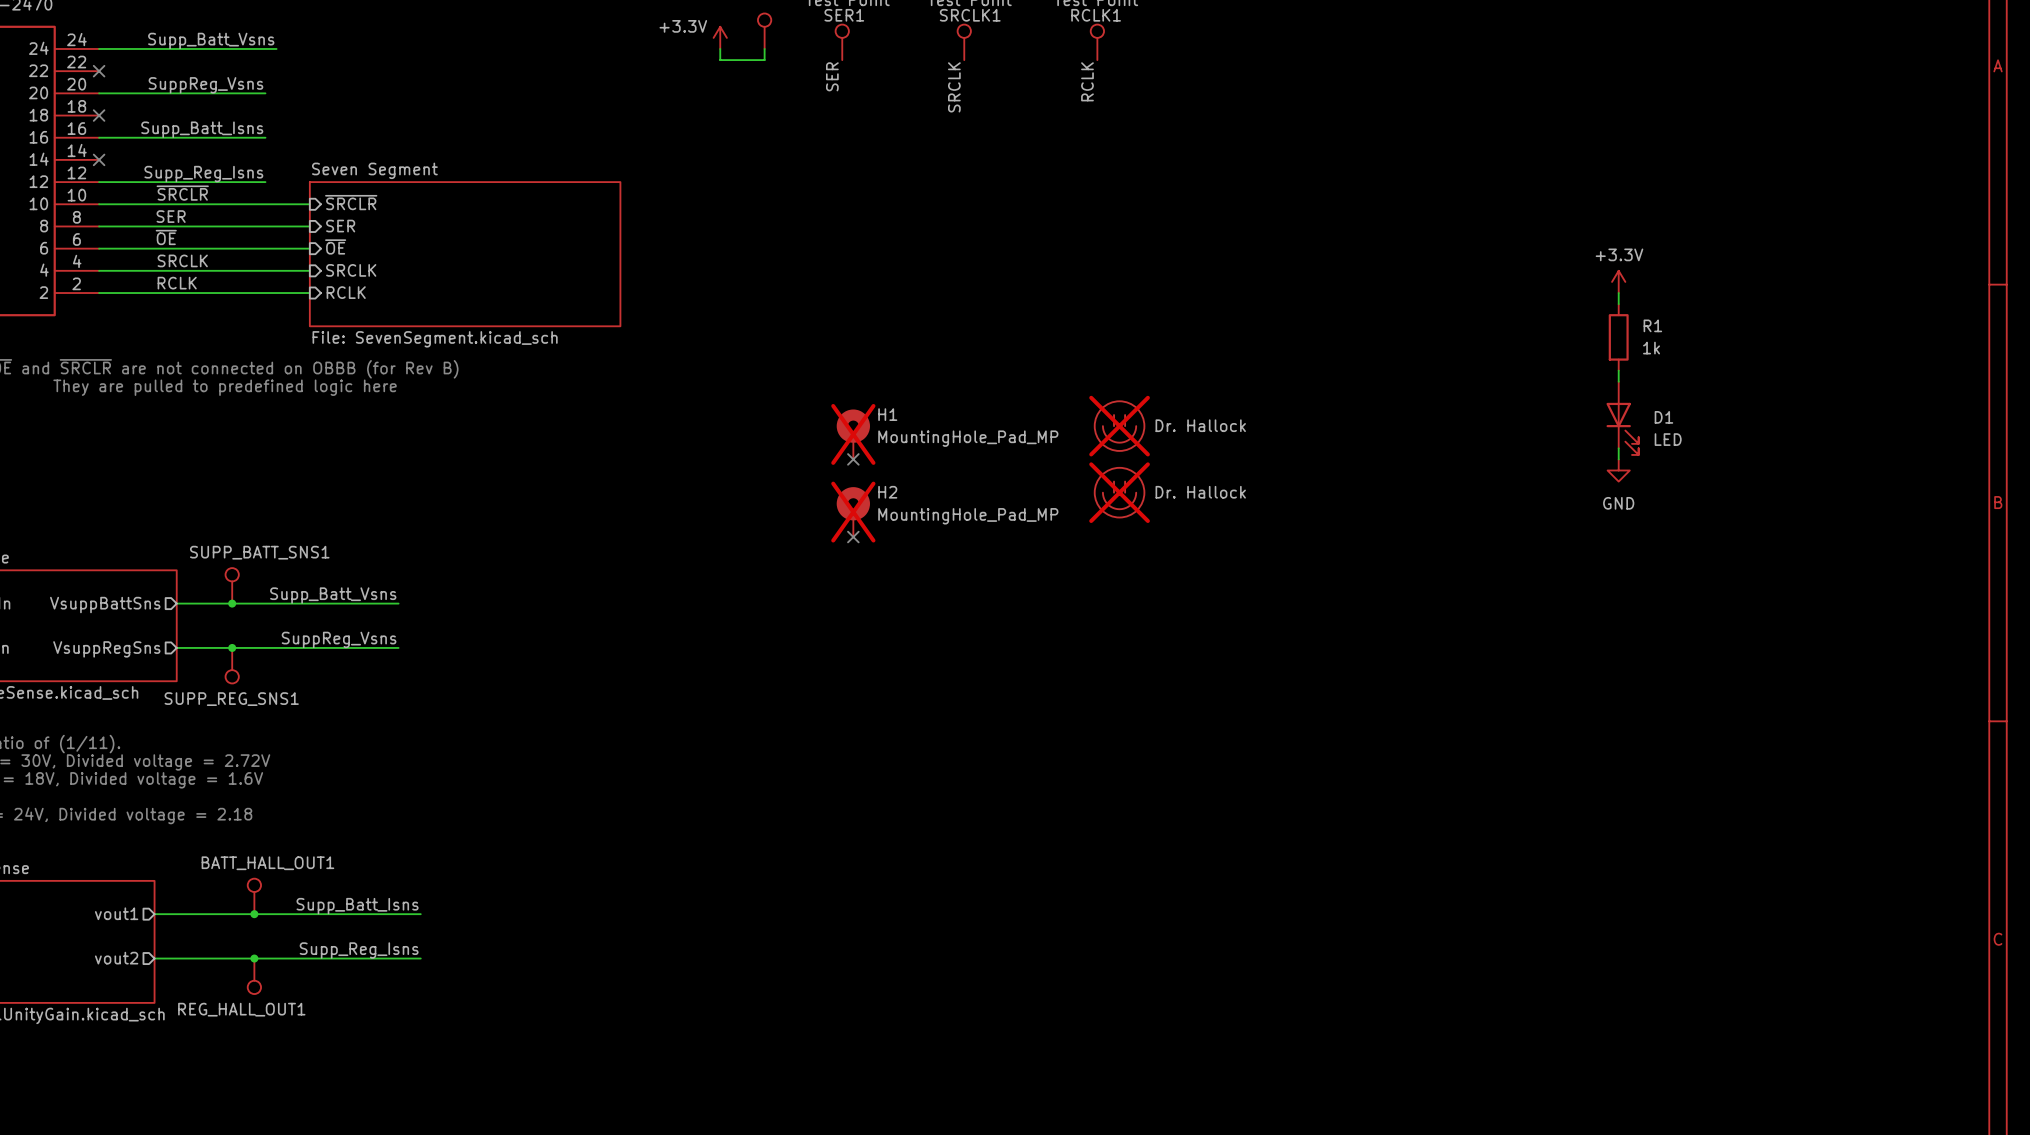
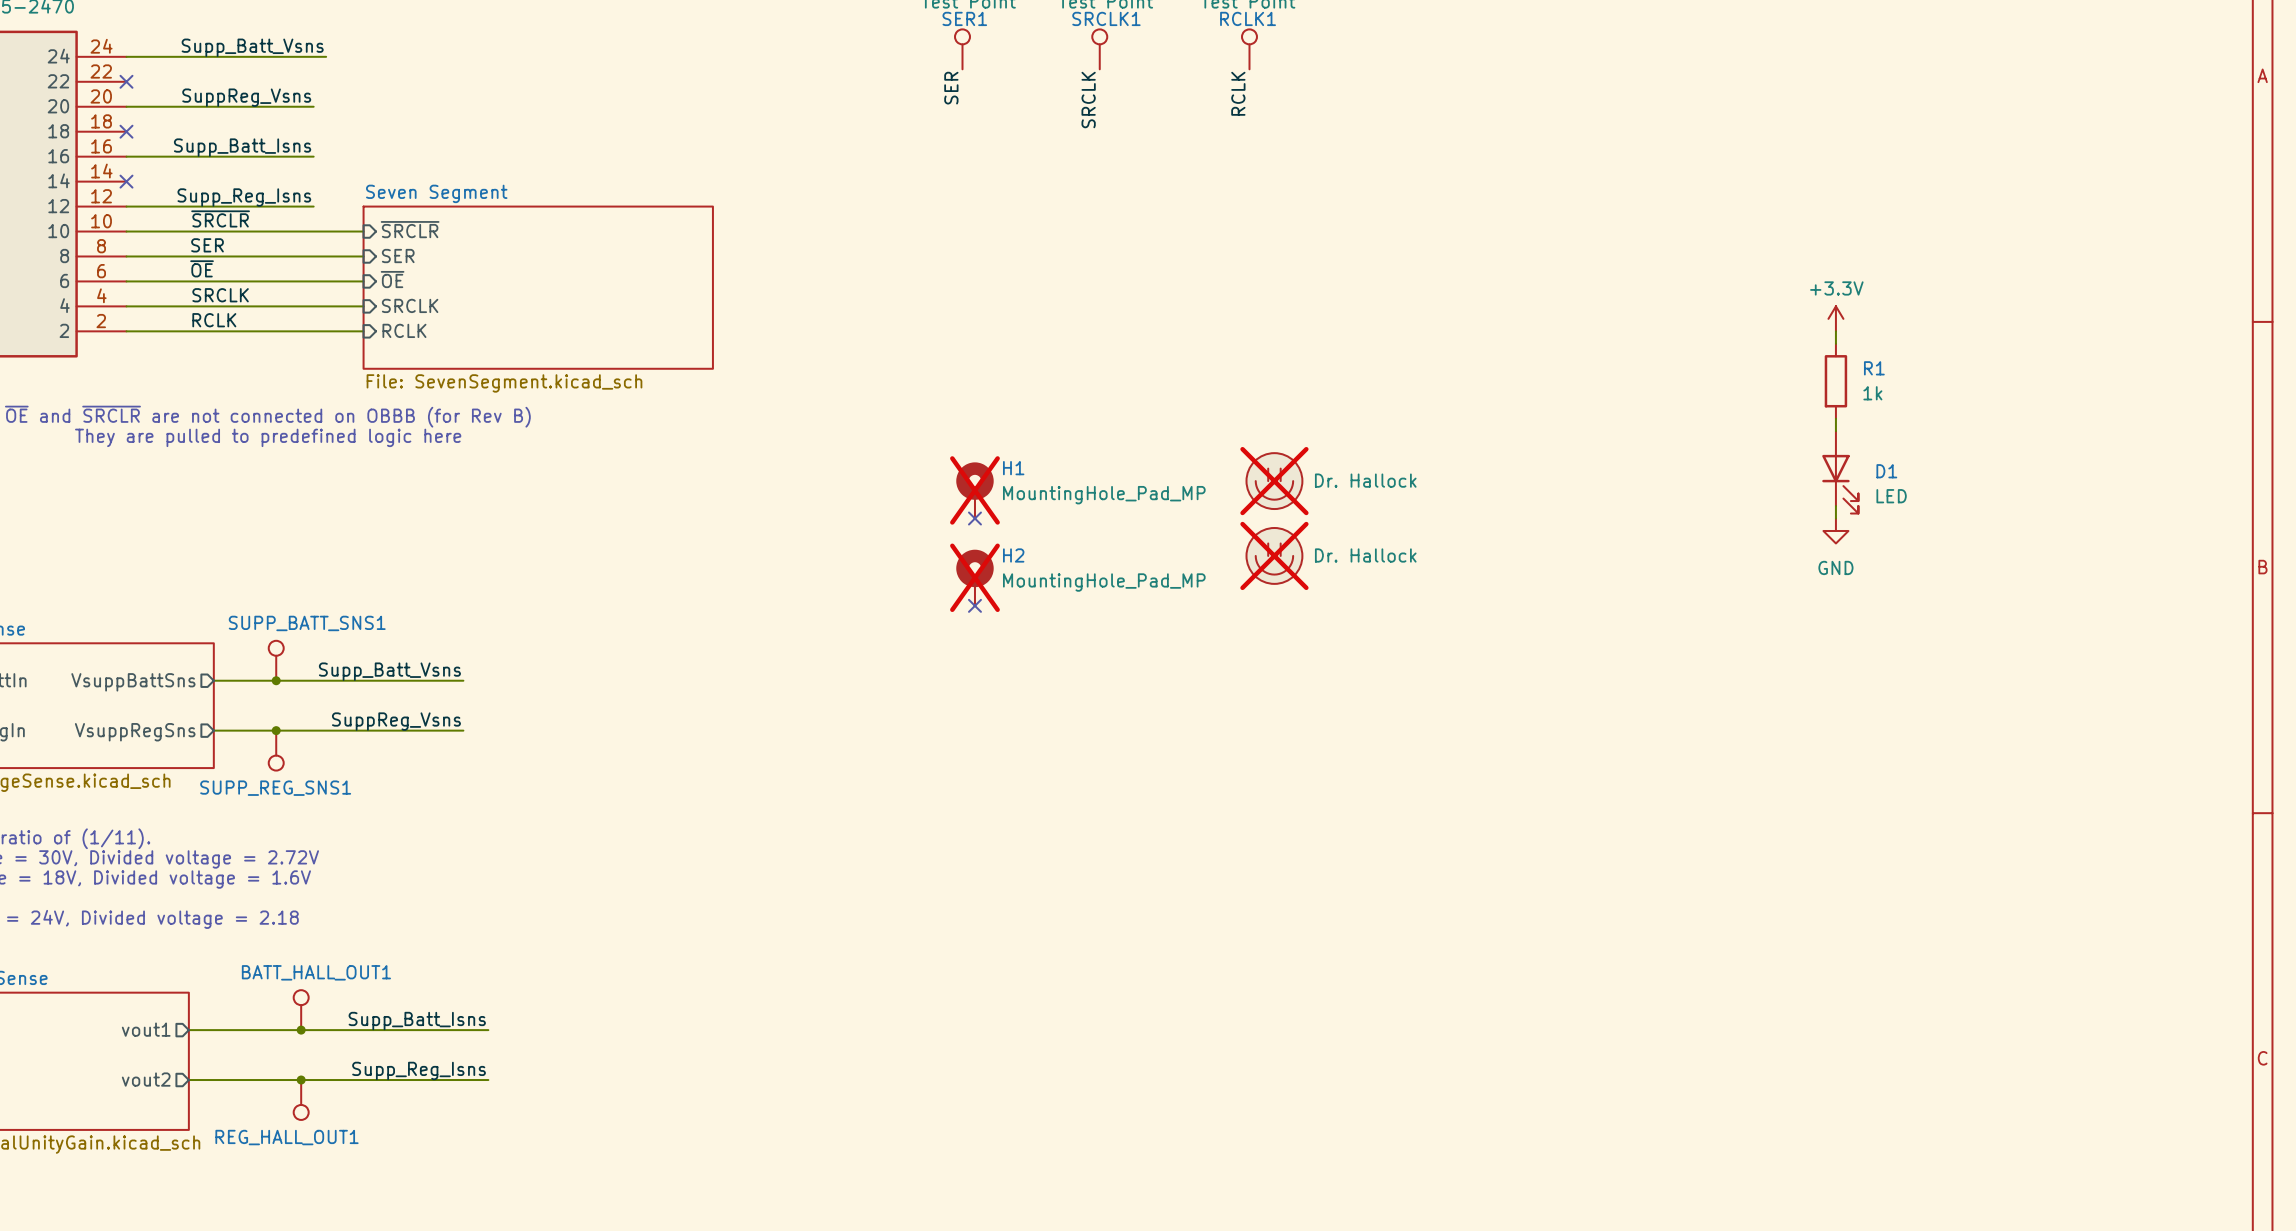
part: (764, 31) -> none
power symbol: +3.3V (720, 37) -> none
wire: (720, 48) (720, 60) (764, 60) (764, 48) -> none

